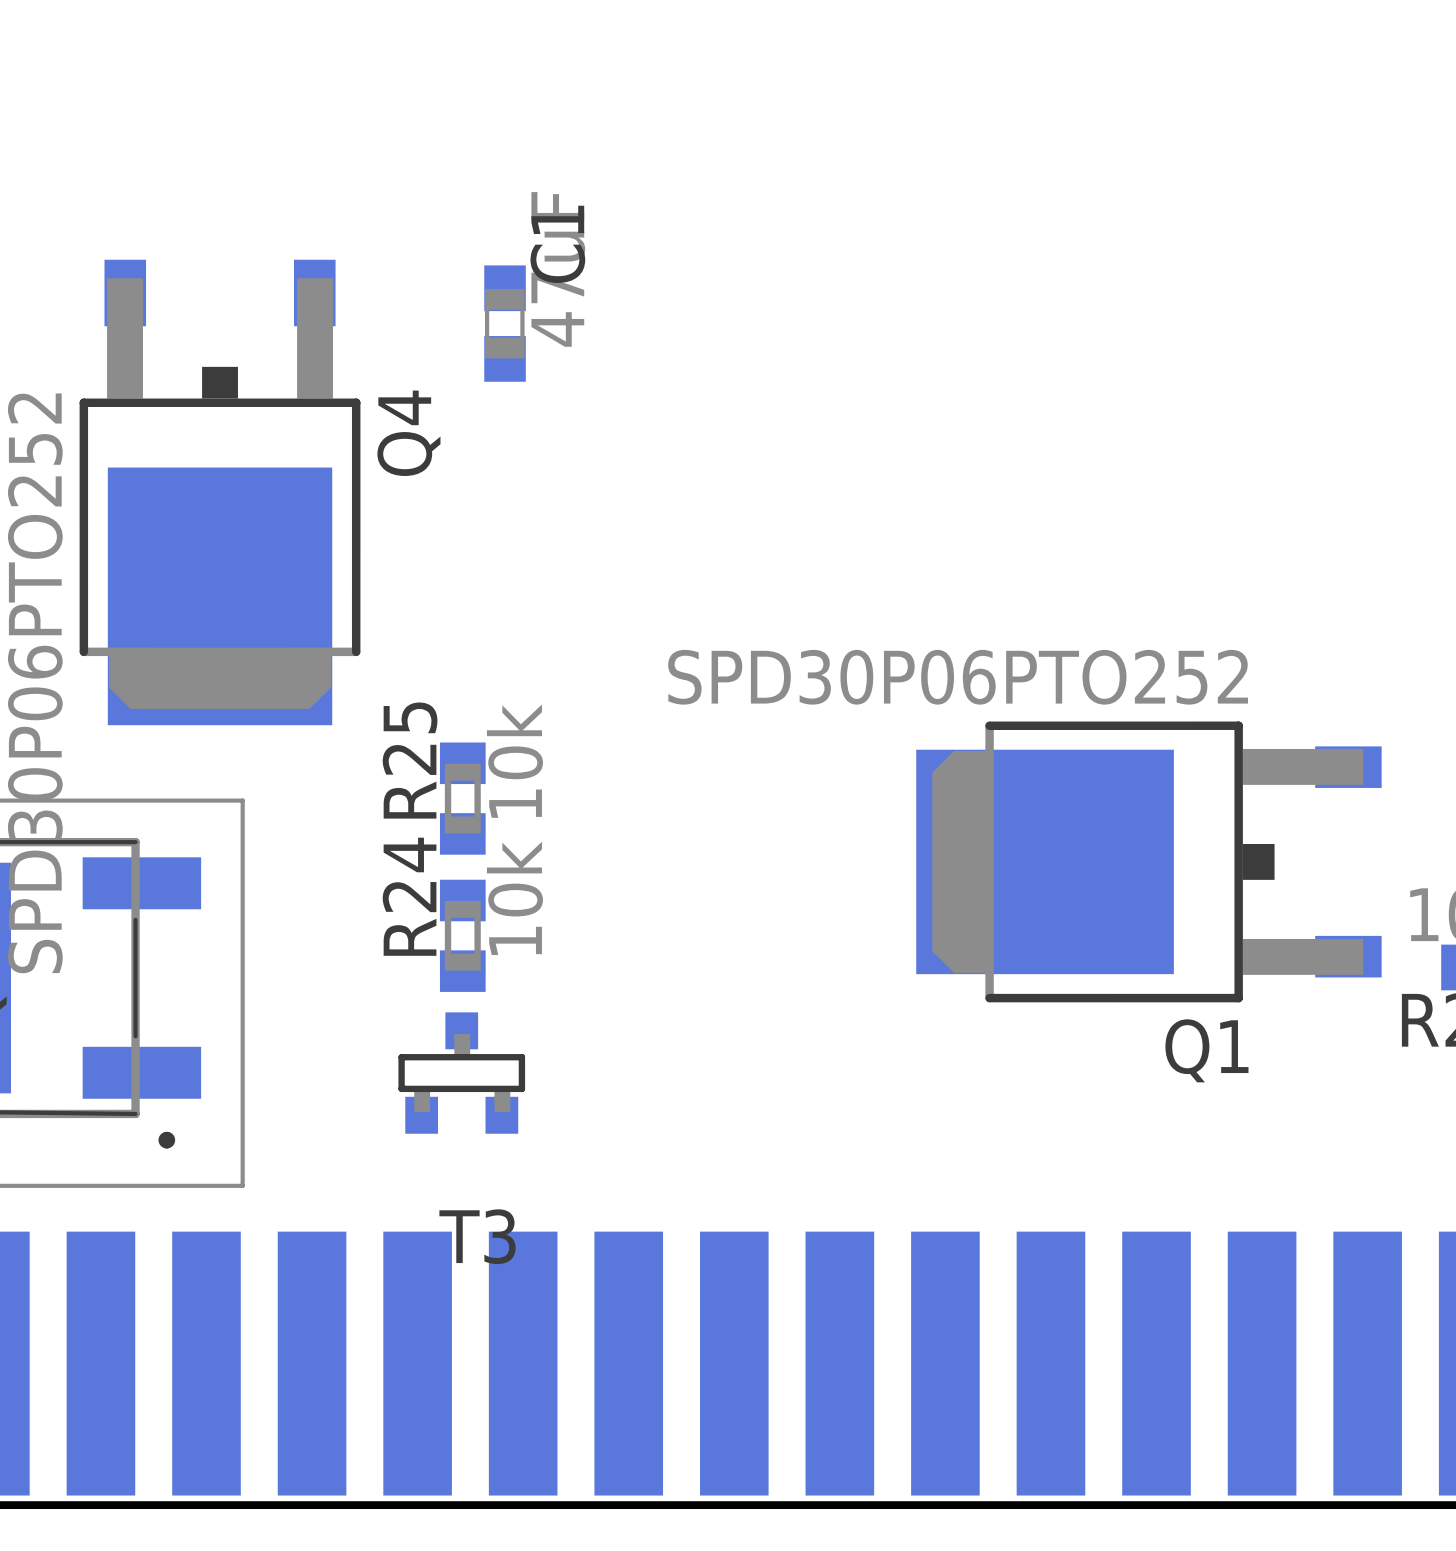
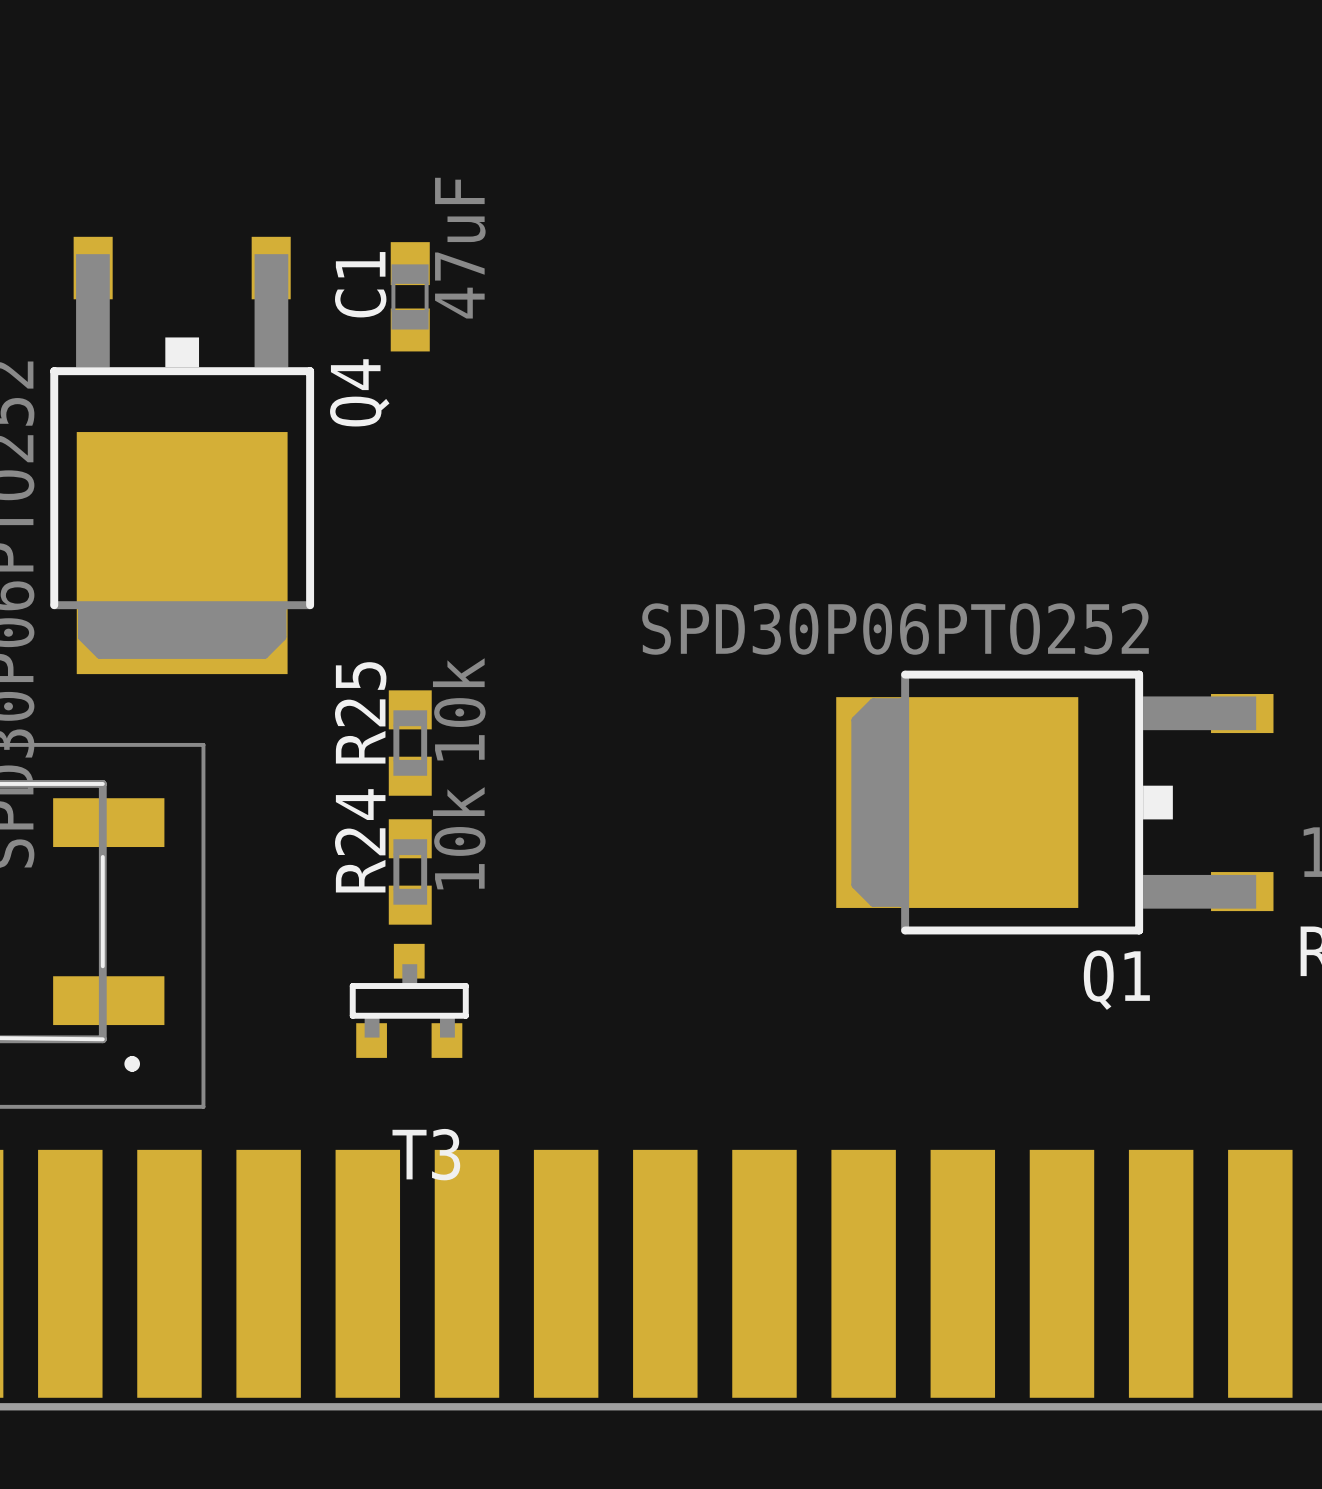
C1 name position: C1 (557, 244) -> C1 (360, 284)
C1 position: (505, 323) -> (410, 296)

